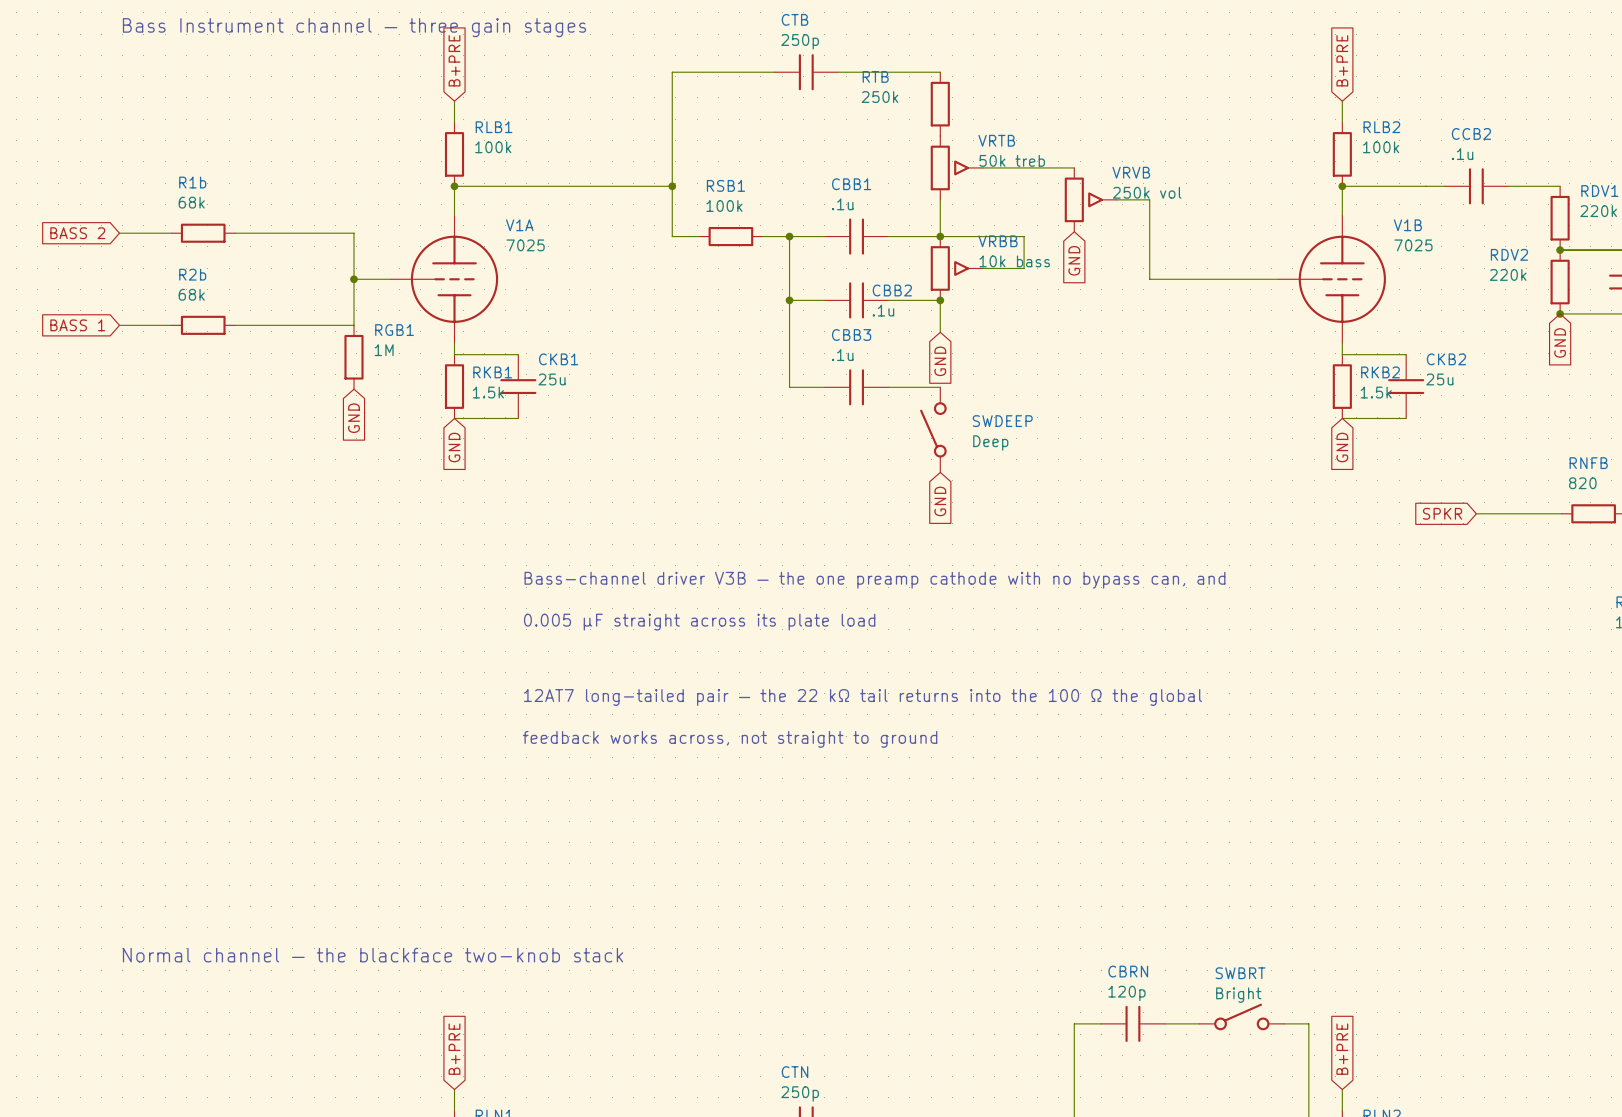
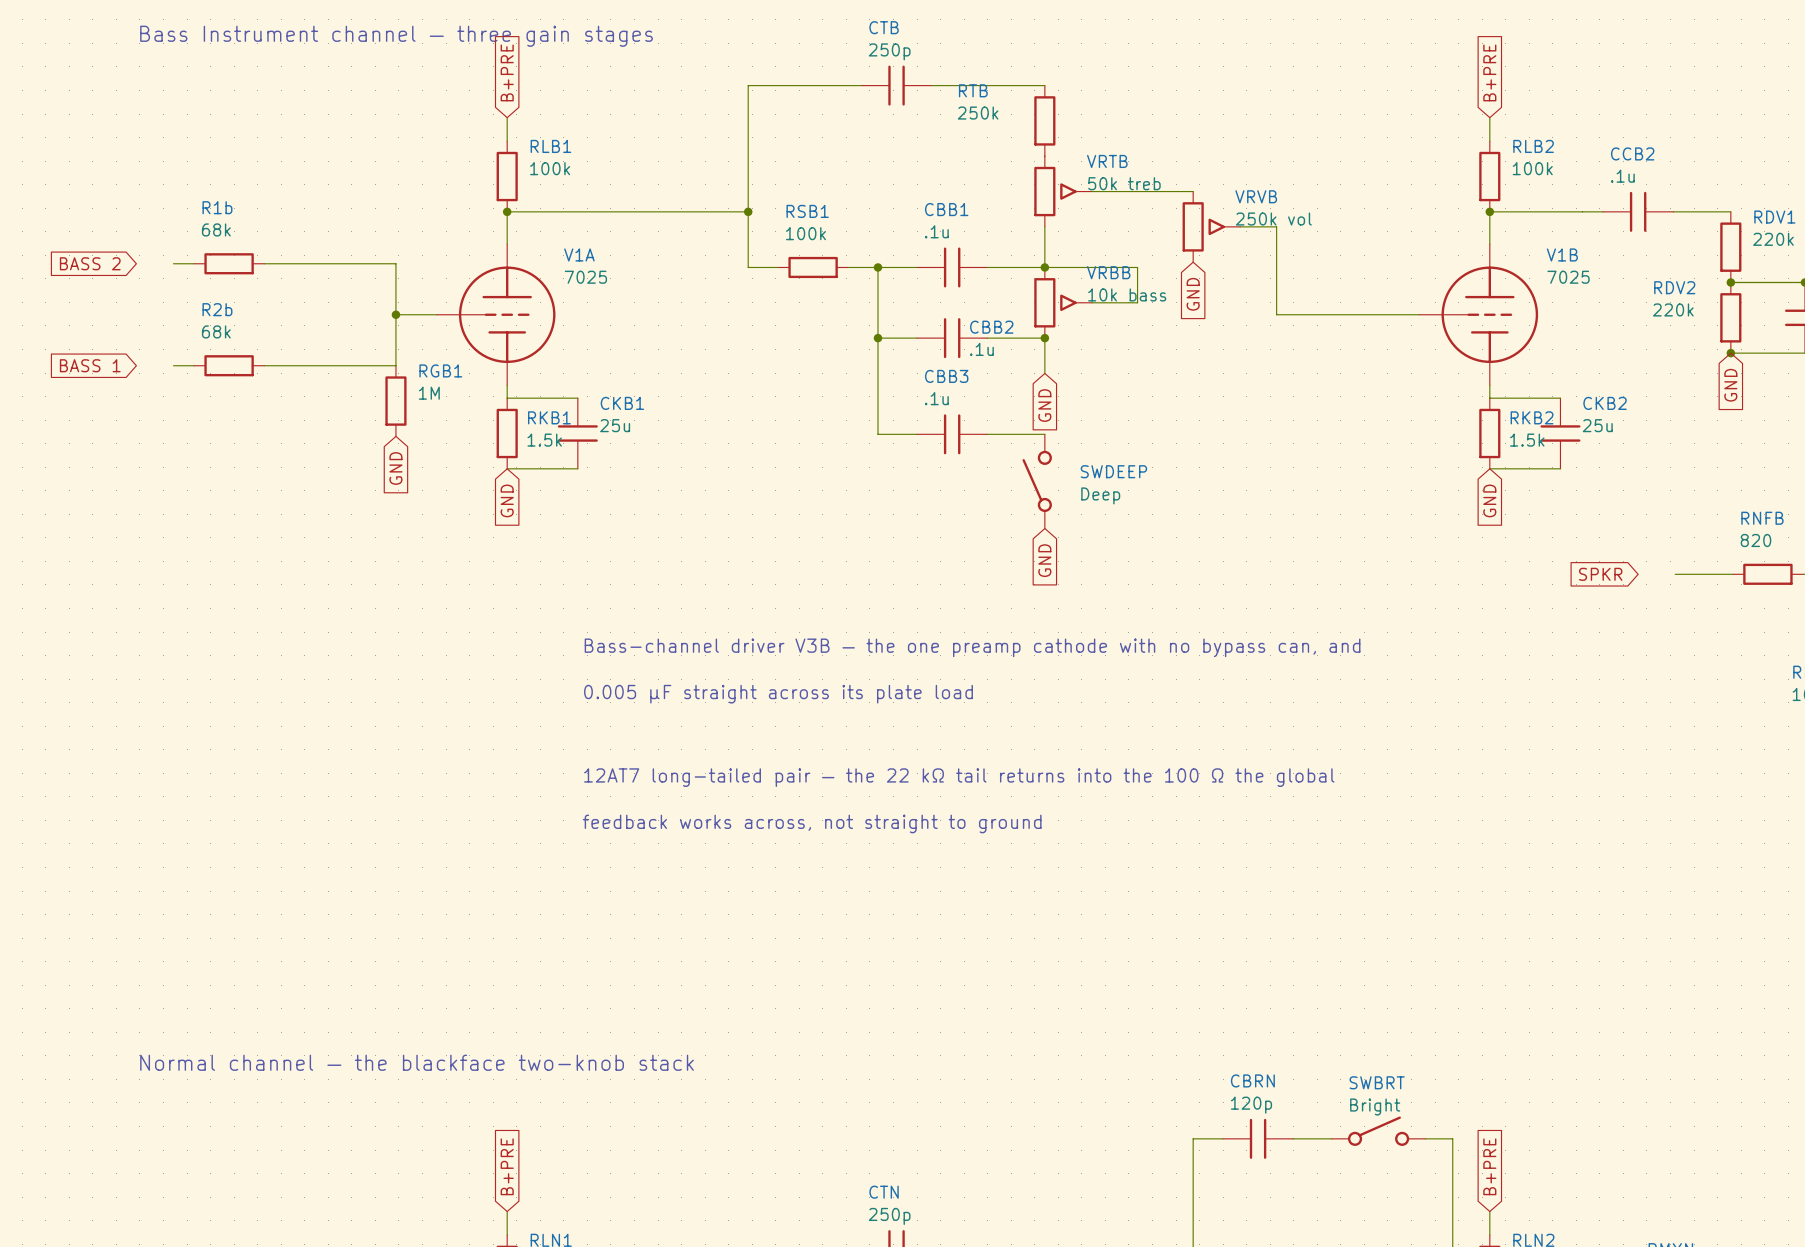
wire: (119, 233) (152, 233) -> none
wire: (119, 325) (152, 325) -> none
wire: (1476, 513) (1509, 513) -> none

